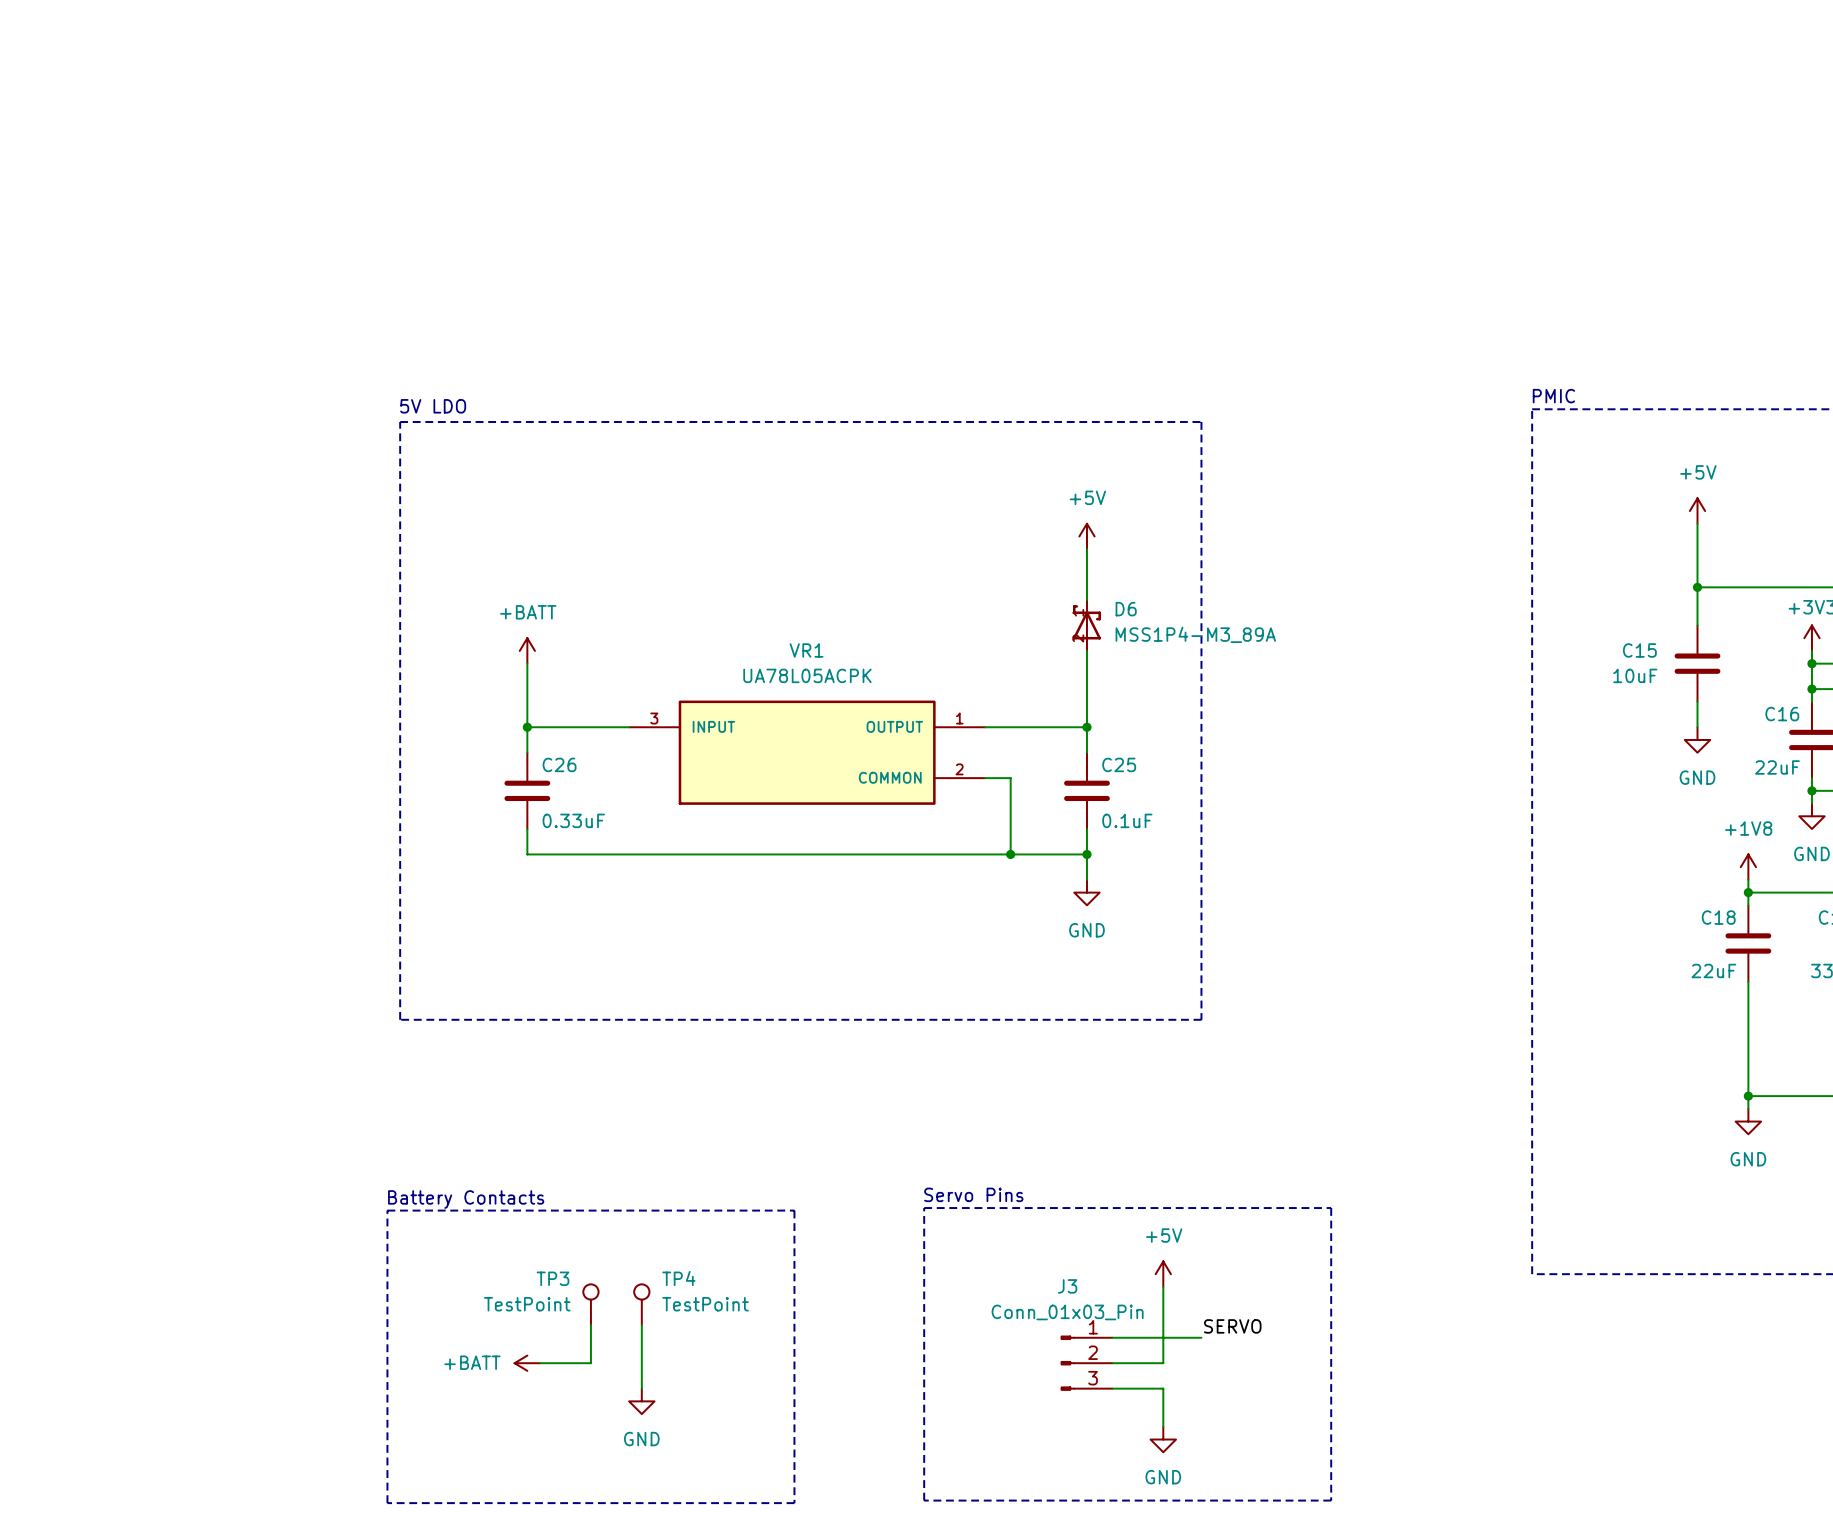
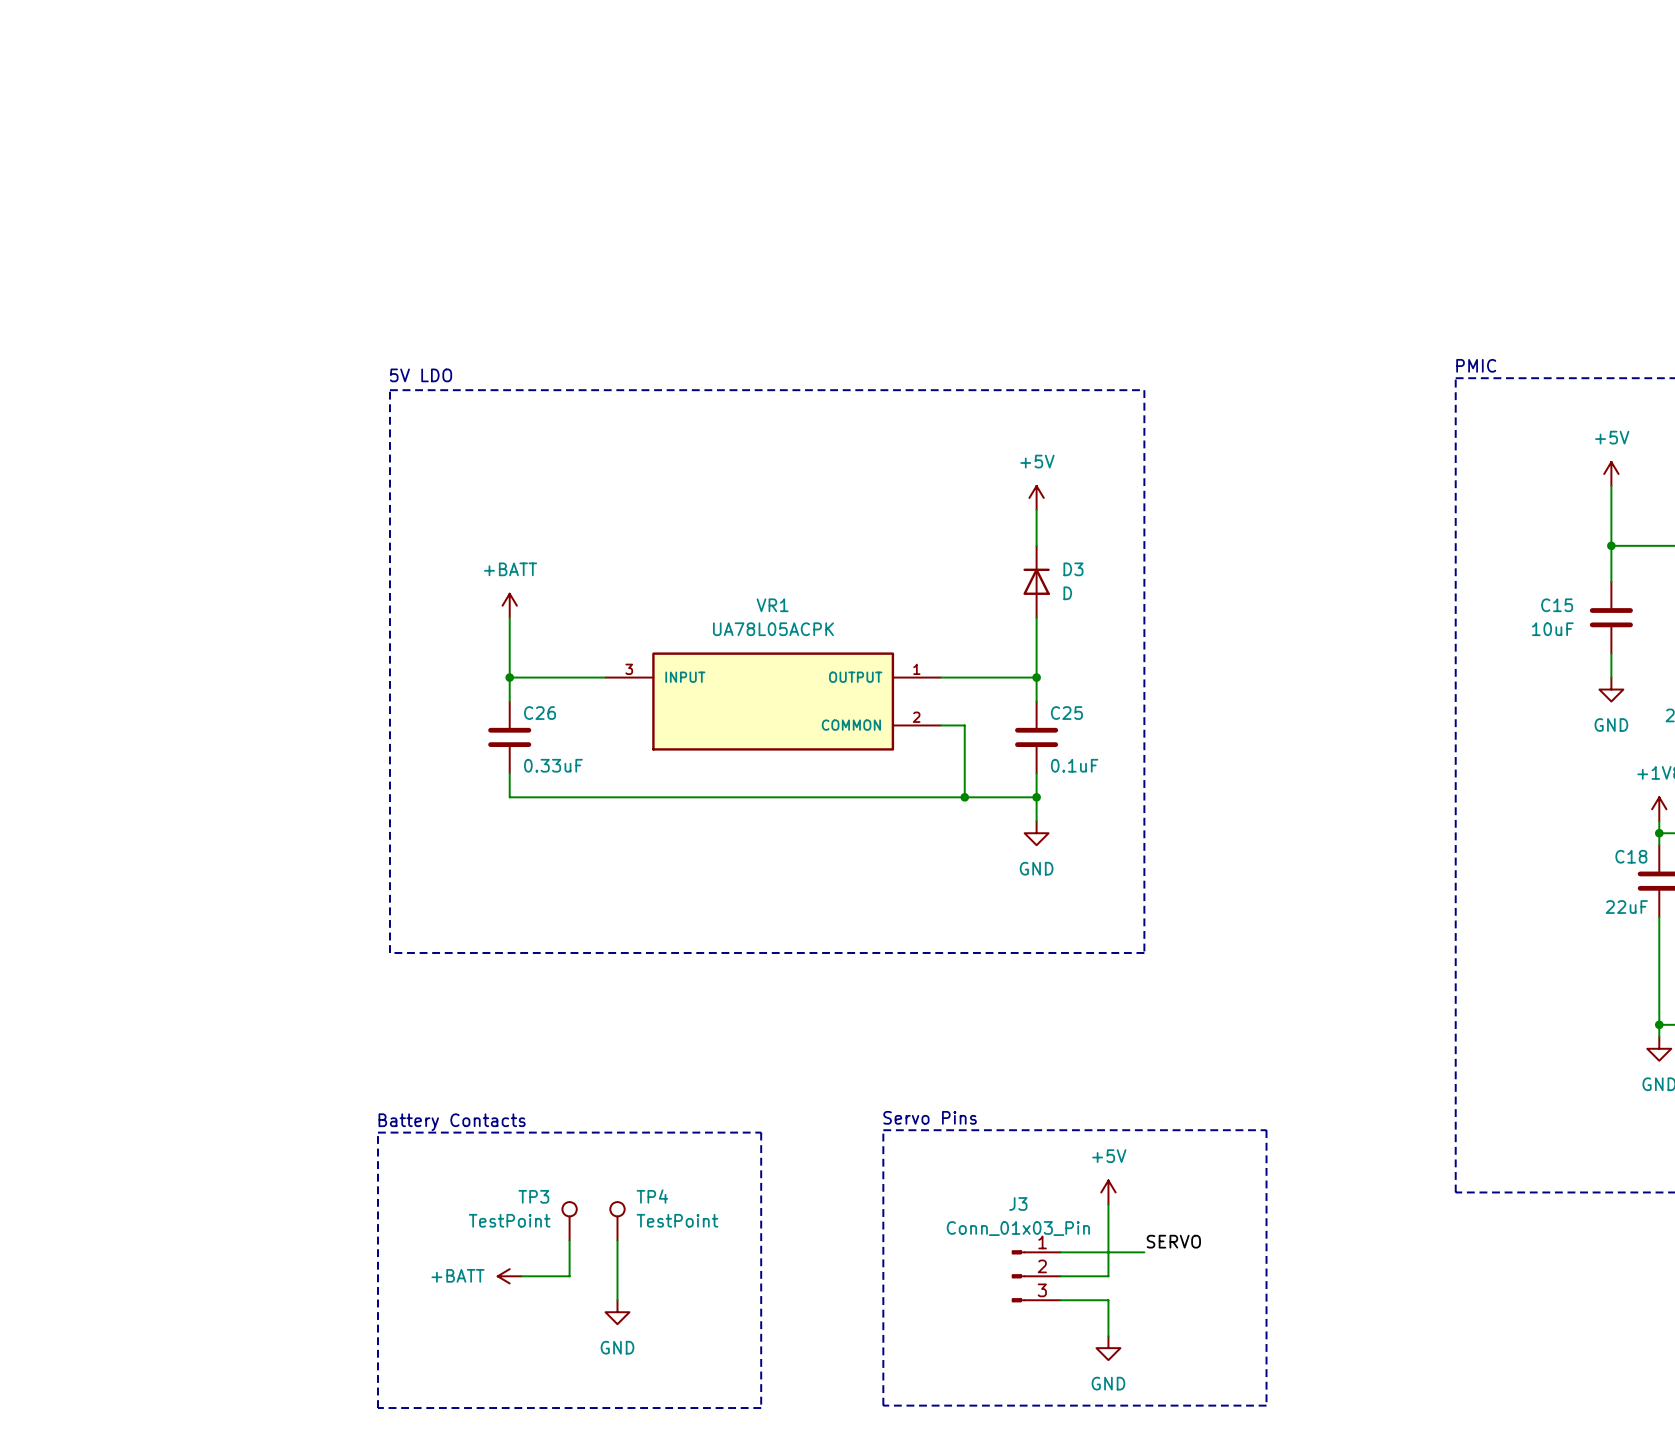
D6: MSS1P4-M3_89A (1086, 625) -> none
D3: none -> D (1036, 581)

